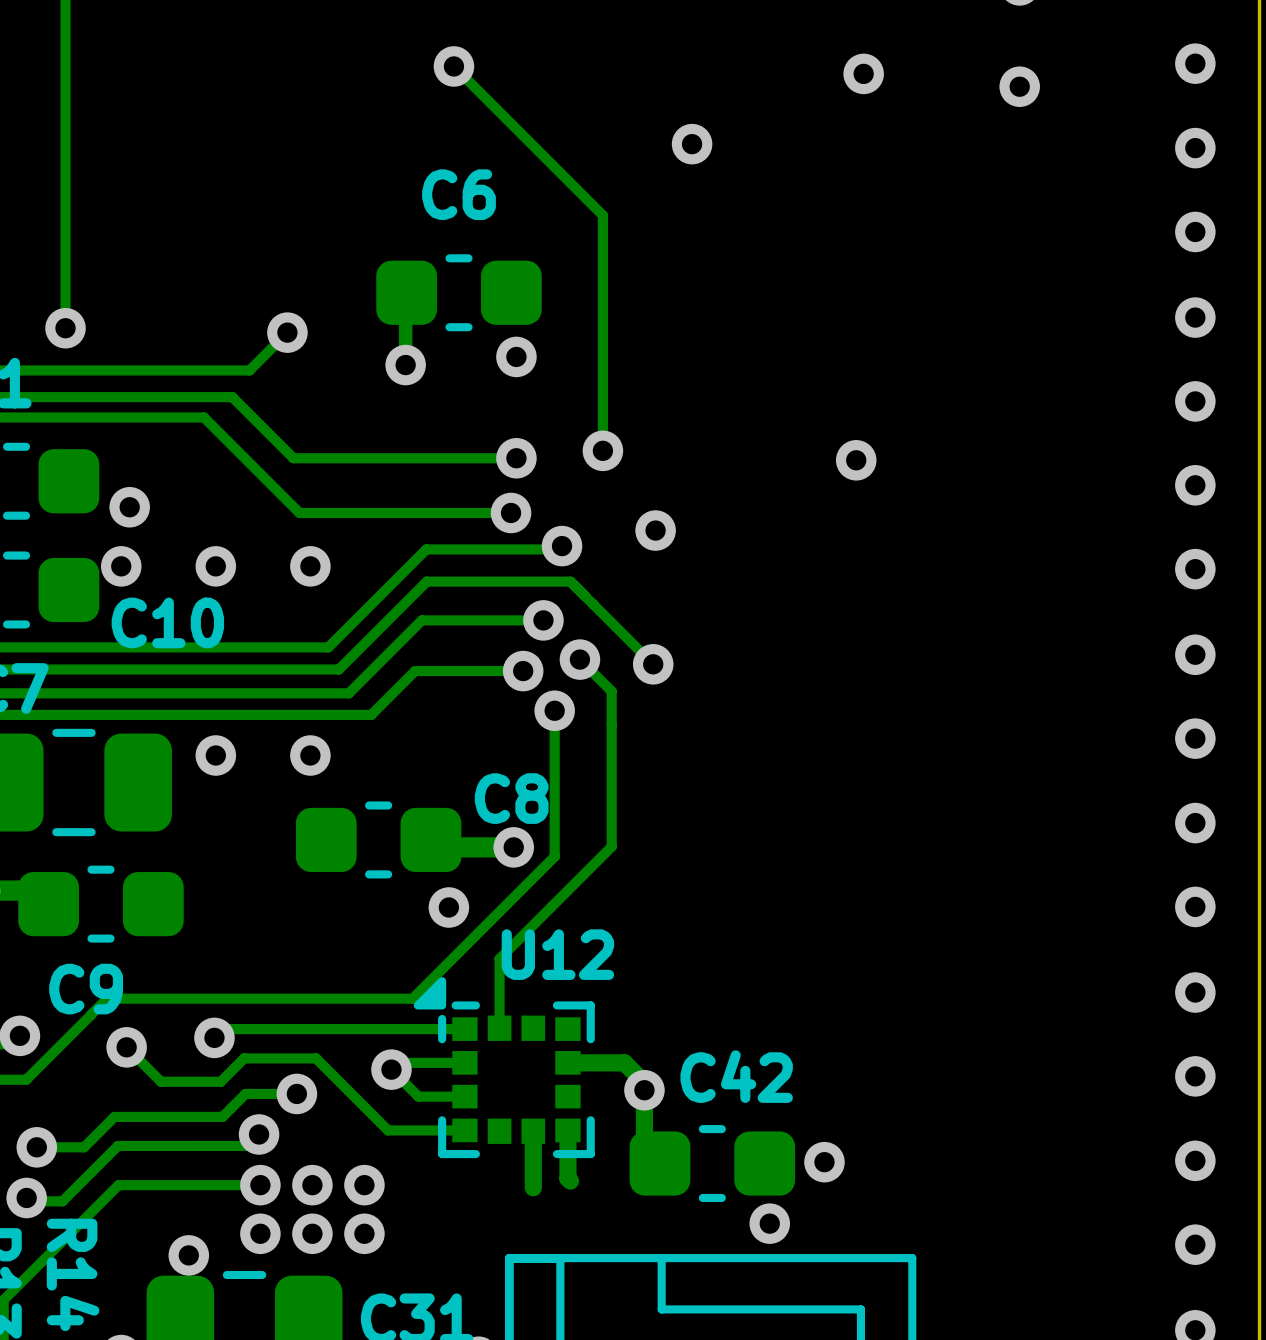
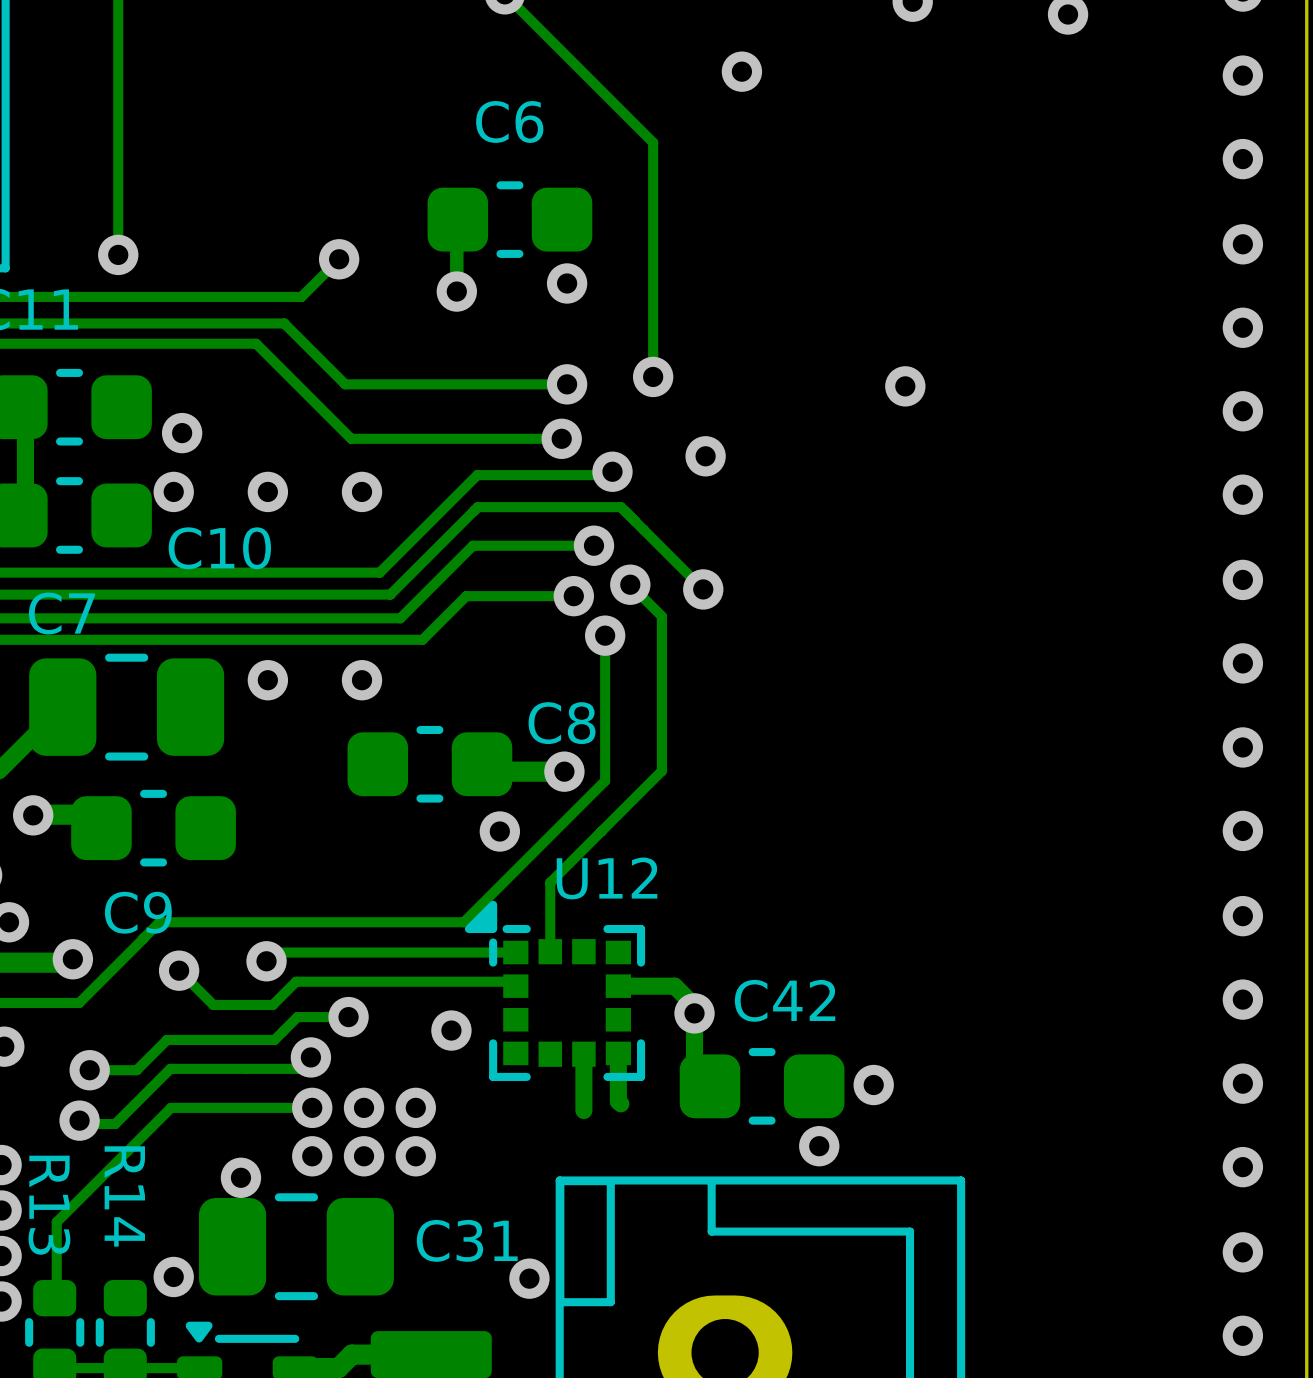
track: (316, 1058) (388, 1130) (464, 1130) -> (367, 981) (511, 981)
track: (464, 1062) (398, 1062) (391, 1069) (418, 1096) (464, 1096) -> none
via position: (391, 1069) -> (451, 1030)

